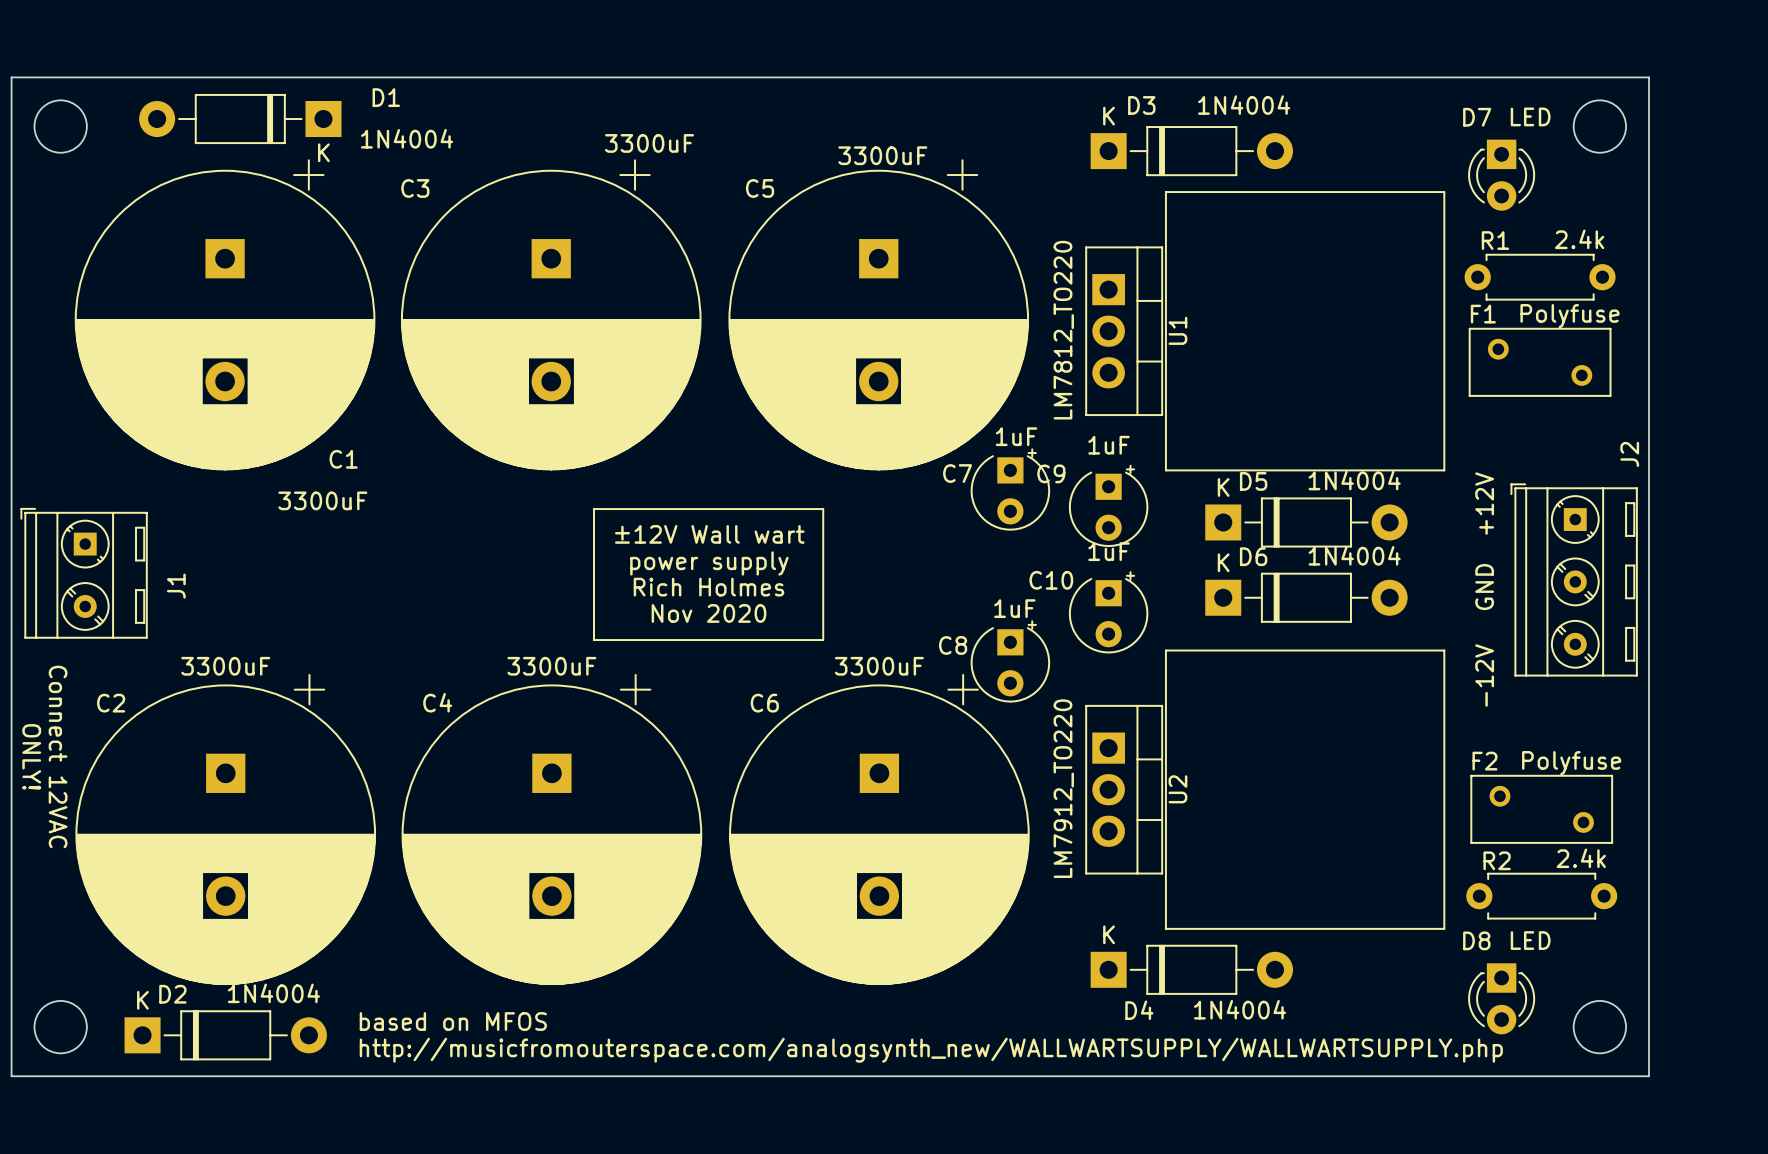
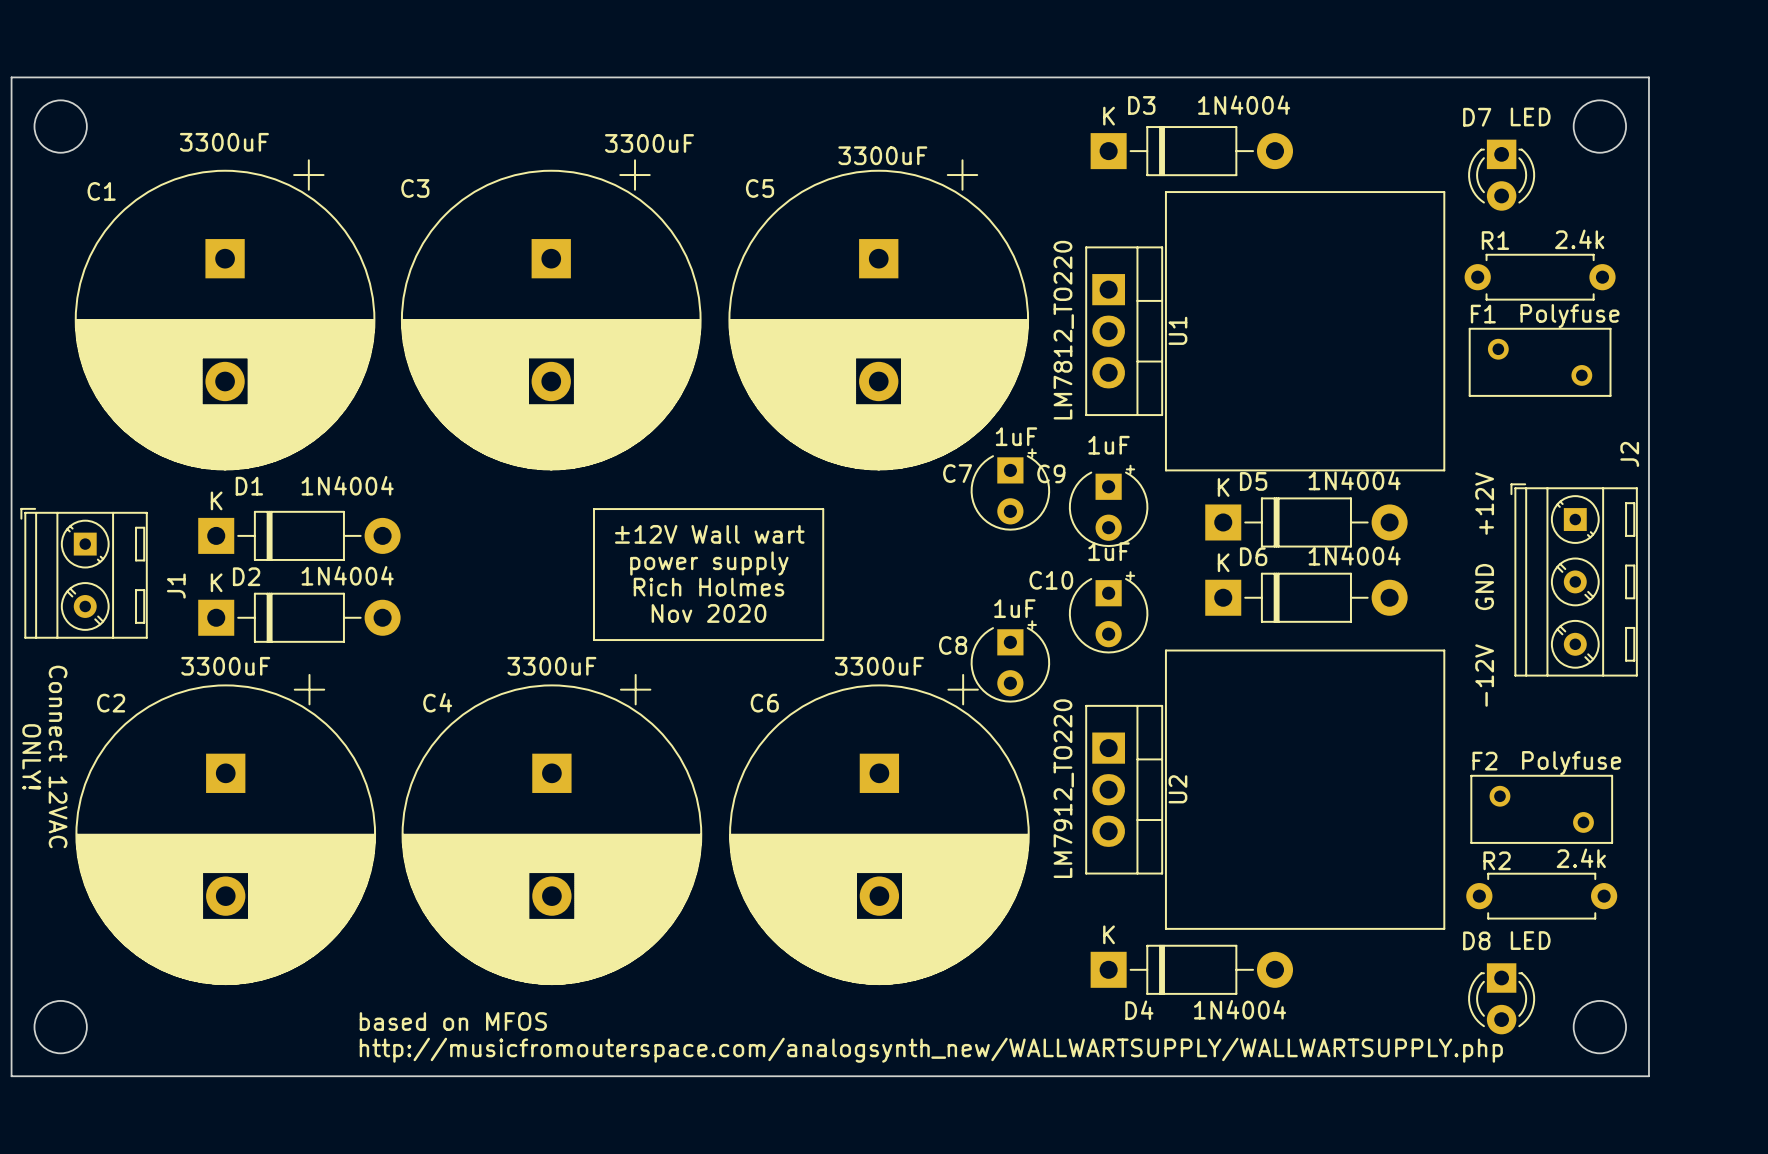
D1 name position: D1 (386, 97) -> D1 (249, 486)
D1 rotation: 0° (240, 119) -> 180° (299, 535)
D1 position: (240, 119) -> (299, 535)
D1 value position: 1N4004 (407, 138) -> 1N4004 (347, 485)
C1 name position: C1 (343, 459) -> C1 (101, 191)
C1 value position: 3300uF (322, 500) -> 3300uF (224, 142)
D2 position: (225, 1035) -> (299, 617)

